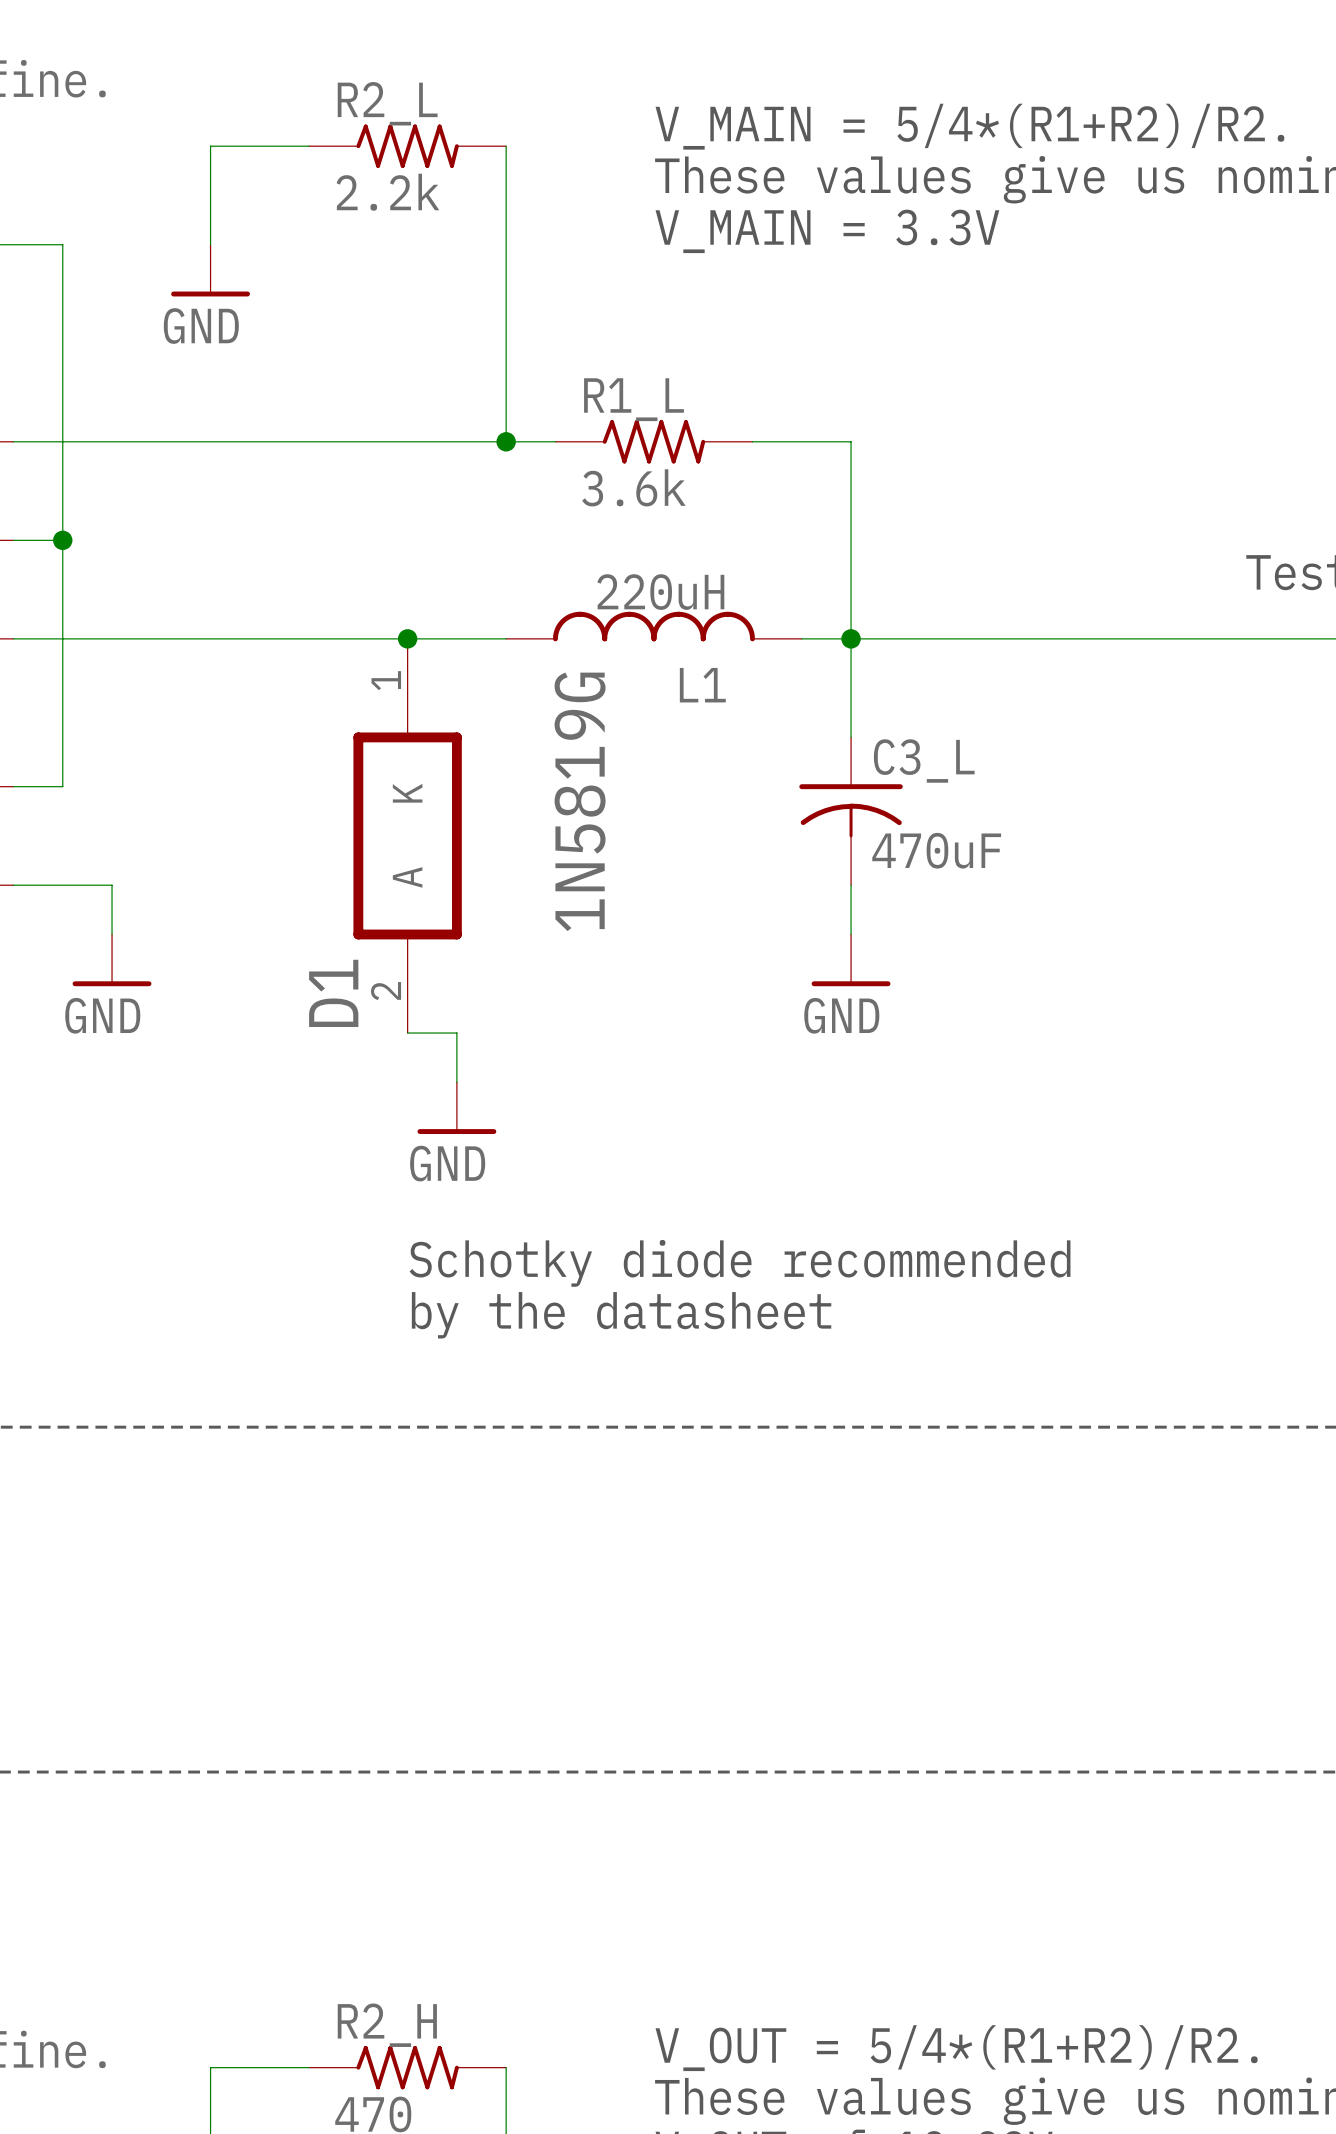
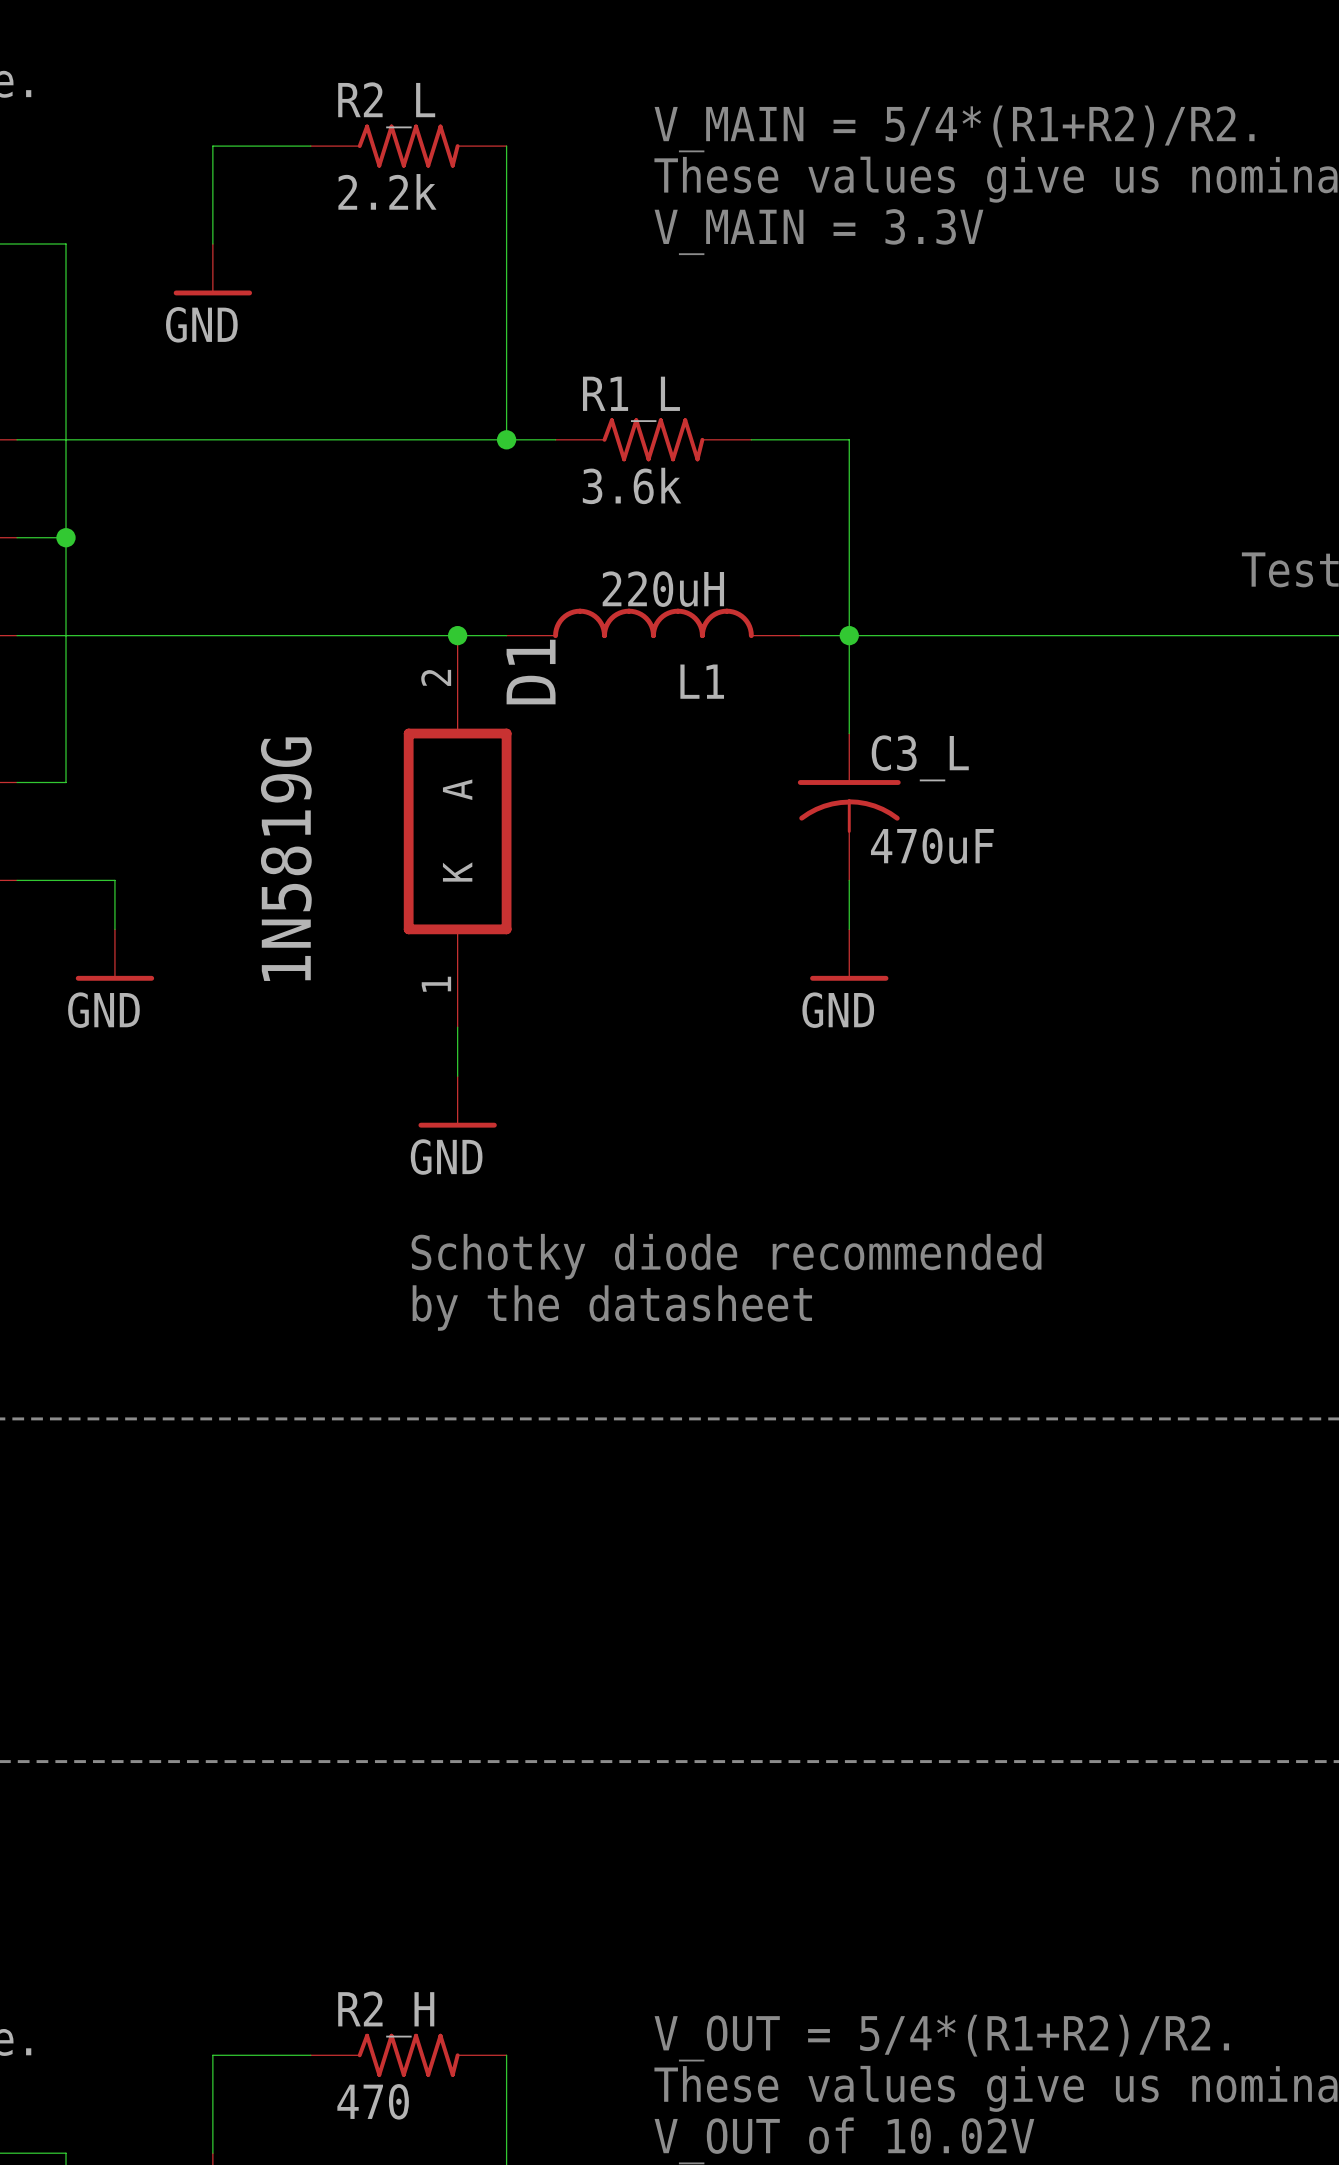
junction position: (407, 638) -> (457, 635)
D1 pin number: 1 (386, 680) -> 2 (436, 677)
D1 pin name: K (407, 793) -> A (457, 789)
D1 text position: 1N5819G (580, 801) -> 1N5819G (286, 859)
D1 position: (407, 835) -> (457, 831)
D1 pin name: A (407, 877) -> K (457, 872)
D1 pin number: 2 (386, 991) -> 1 (436, 984)
D1 name position: D1 (333, 993) -> D1 (531, 672)
wire: (407, 1033) (456, 1033) -> none

